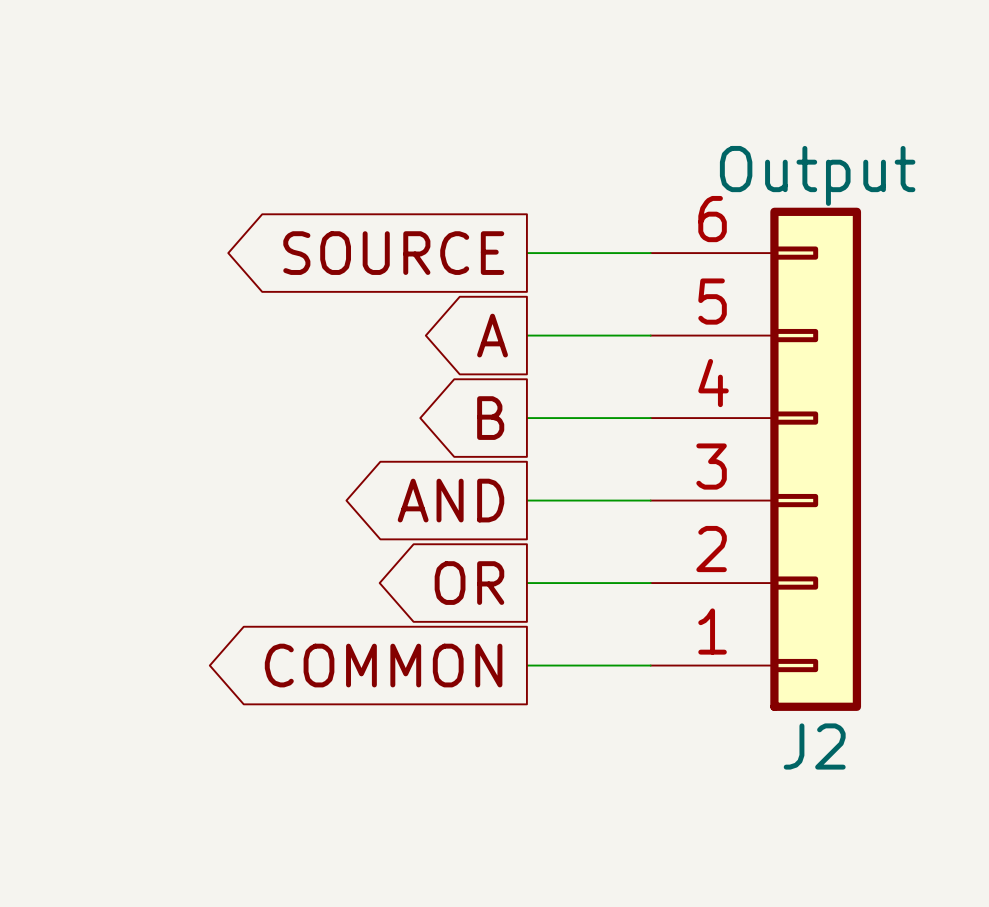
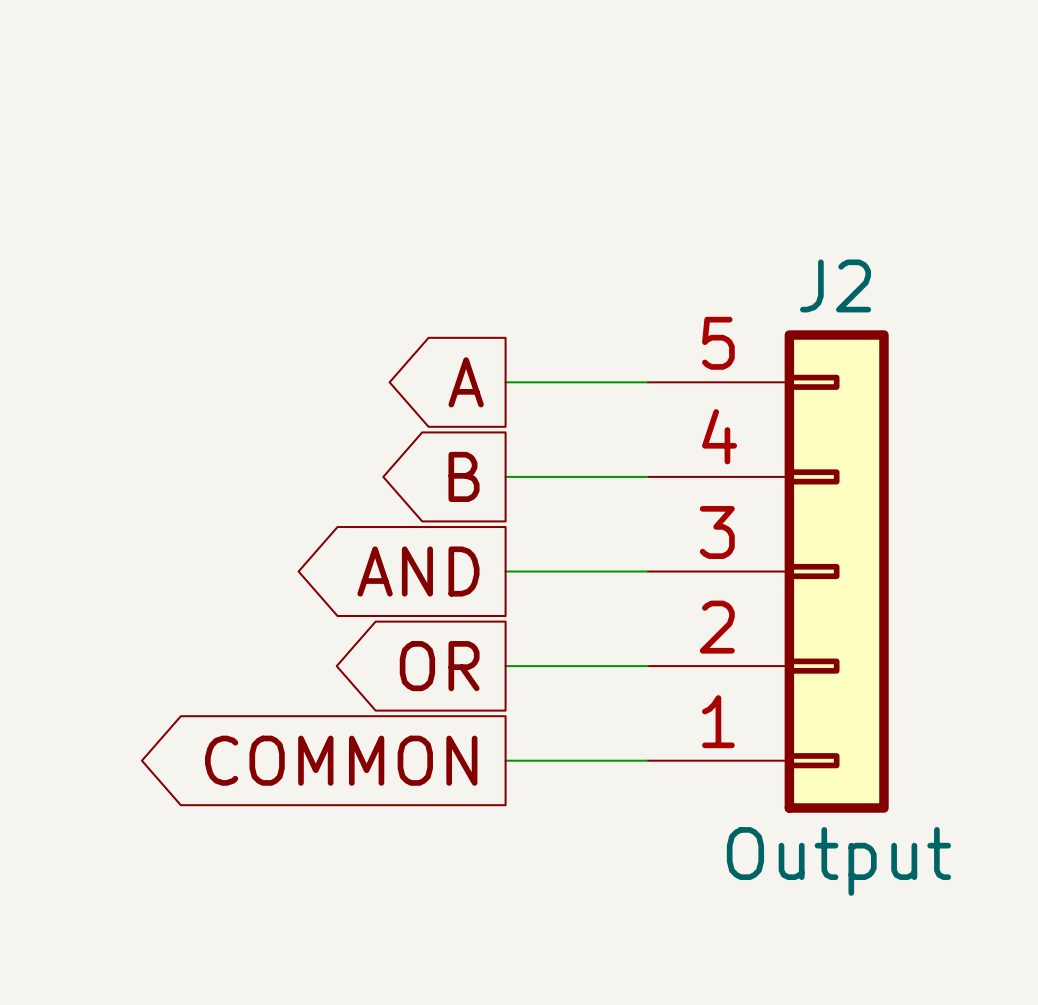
J2 value position: Output (817, 175) -> Output (838, 861)
J2 symbol: [650, 207, 862, 711] -> [647, 330, 889, 813]
global label: SOURCE (393, 253) -> none
wire: (526, 253) (650, 253) -> none
J2 name position: J2 (814, 746) -> J2 (835, 285)

